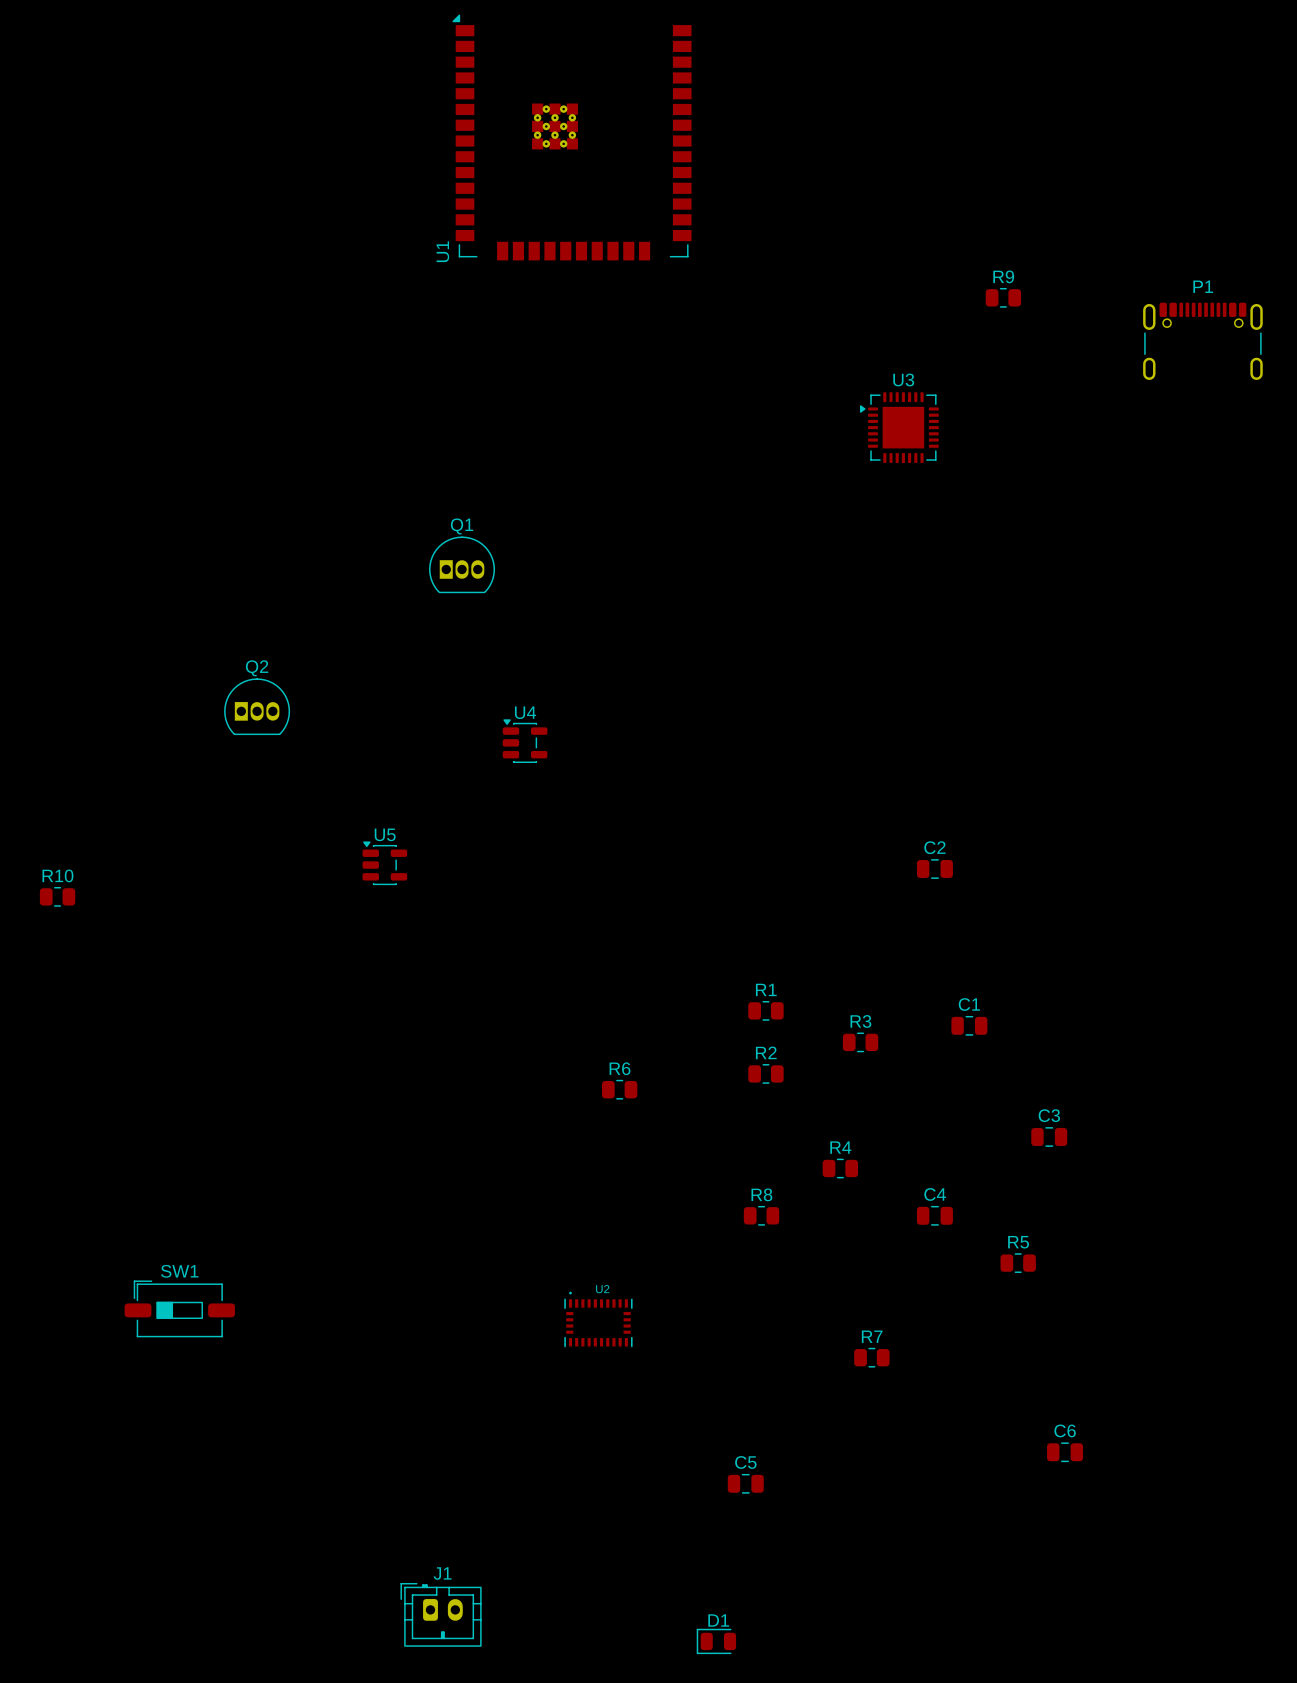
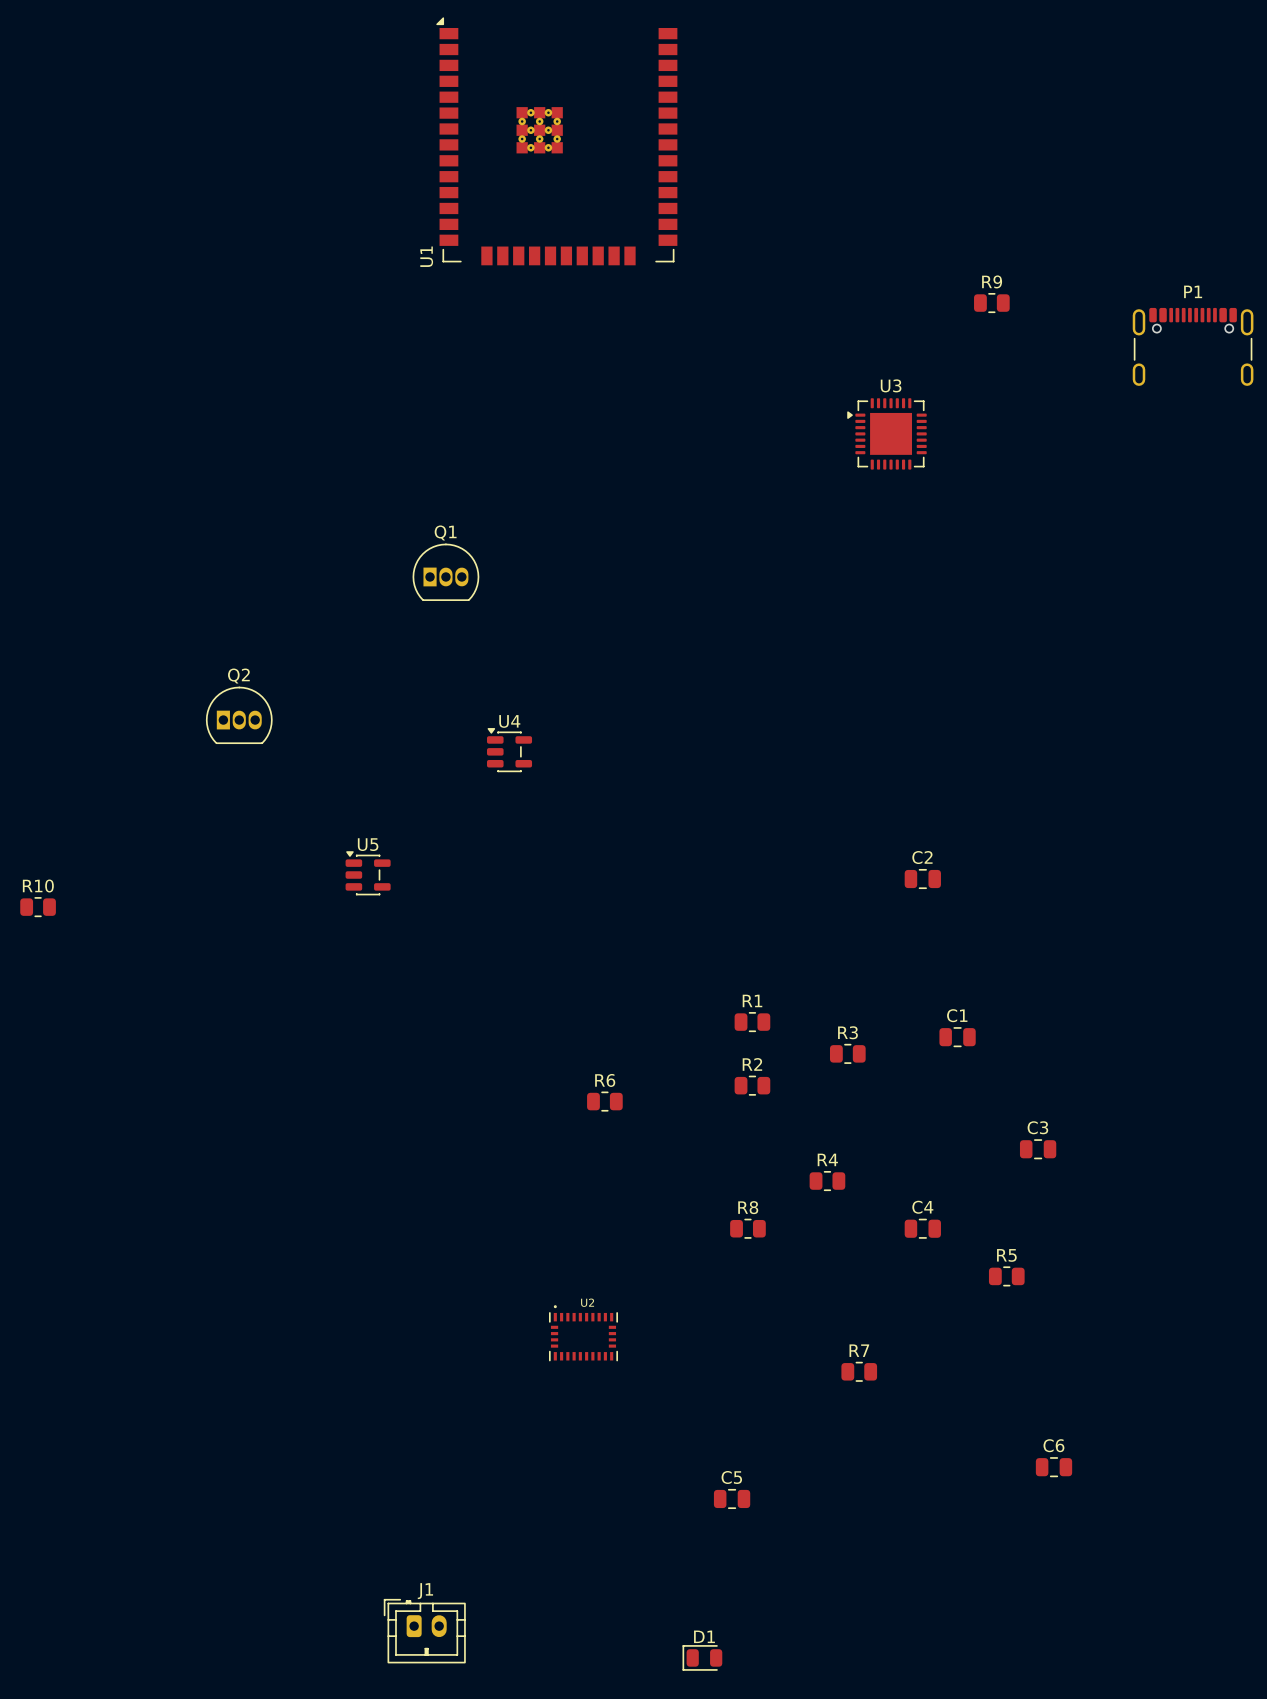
SW1: (179, 1308) -> none

